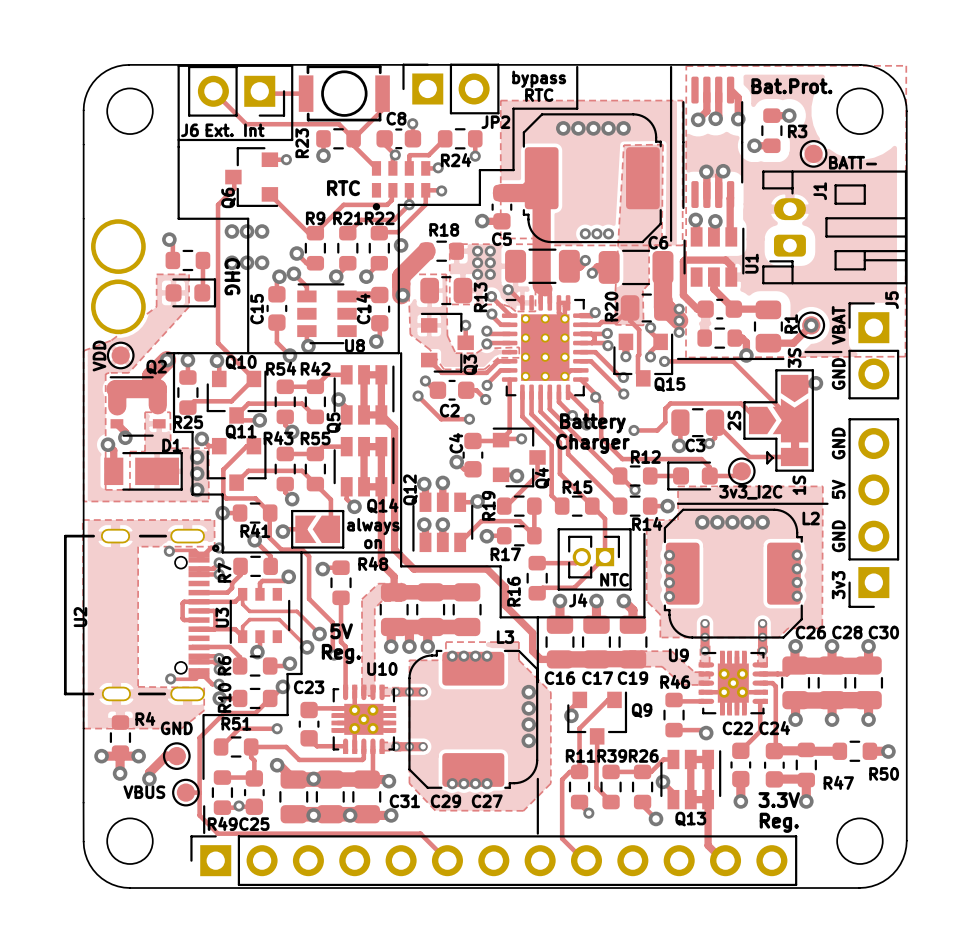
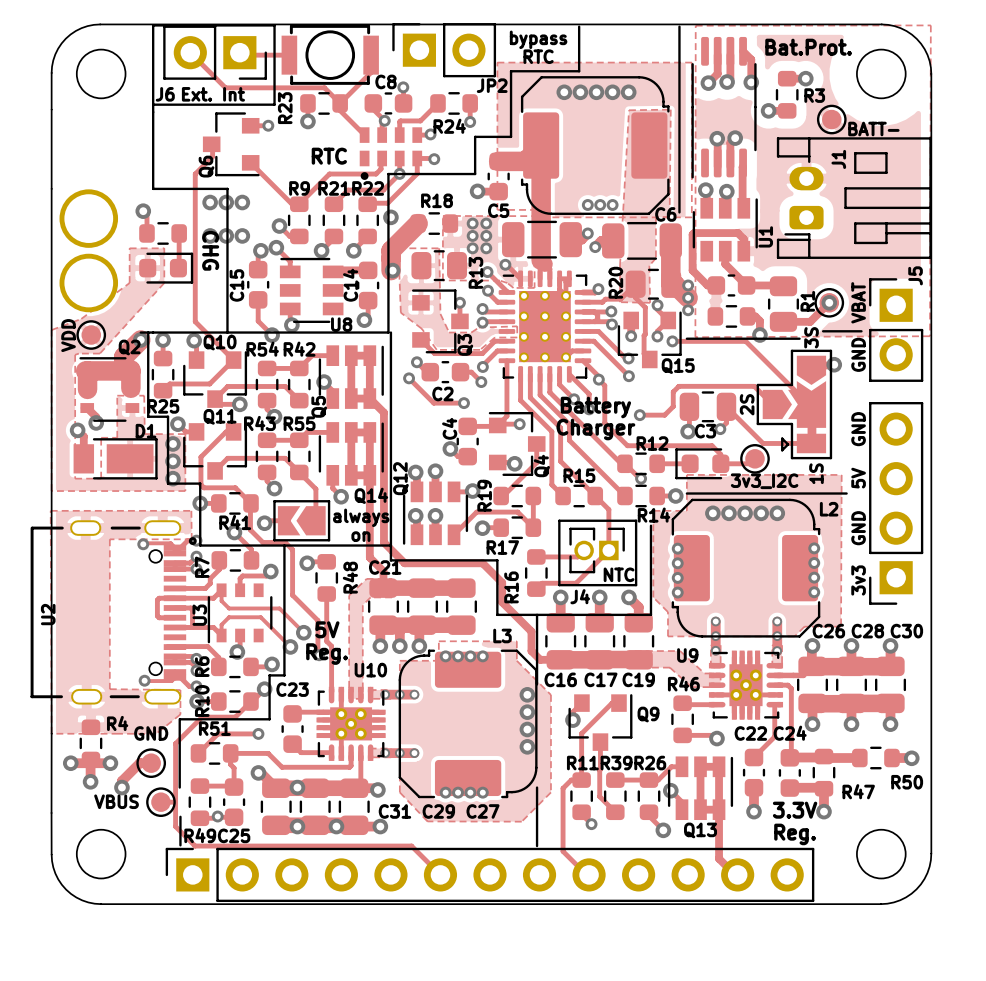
R48 name rotation: 0° (373, 563) -> 90° counterclockwise (350, 577)
C21 name: none -> C21 (385, 567)

